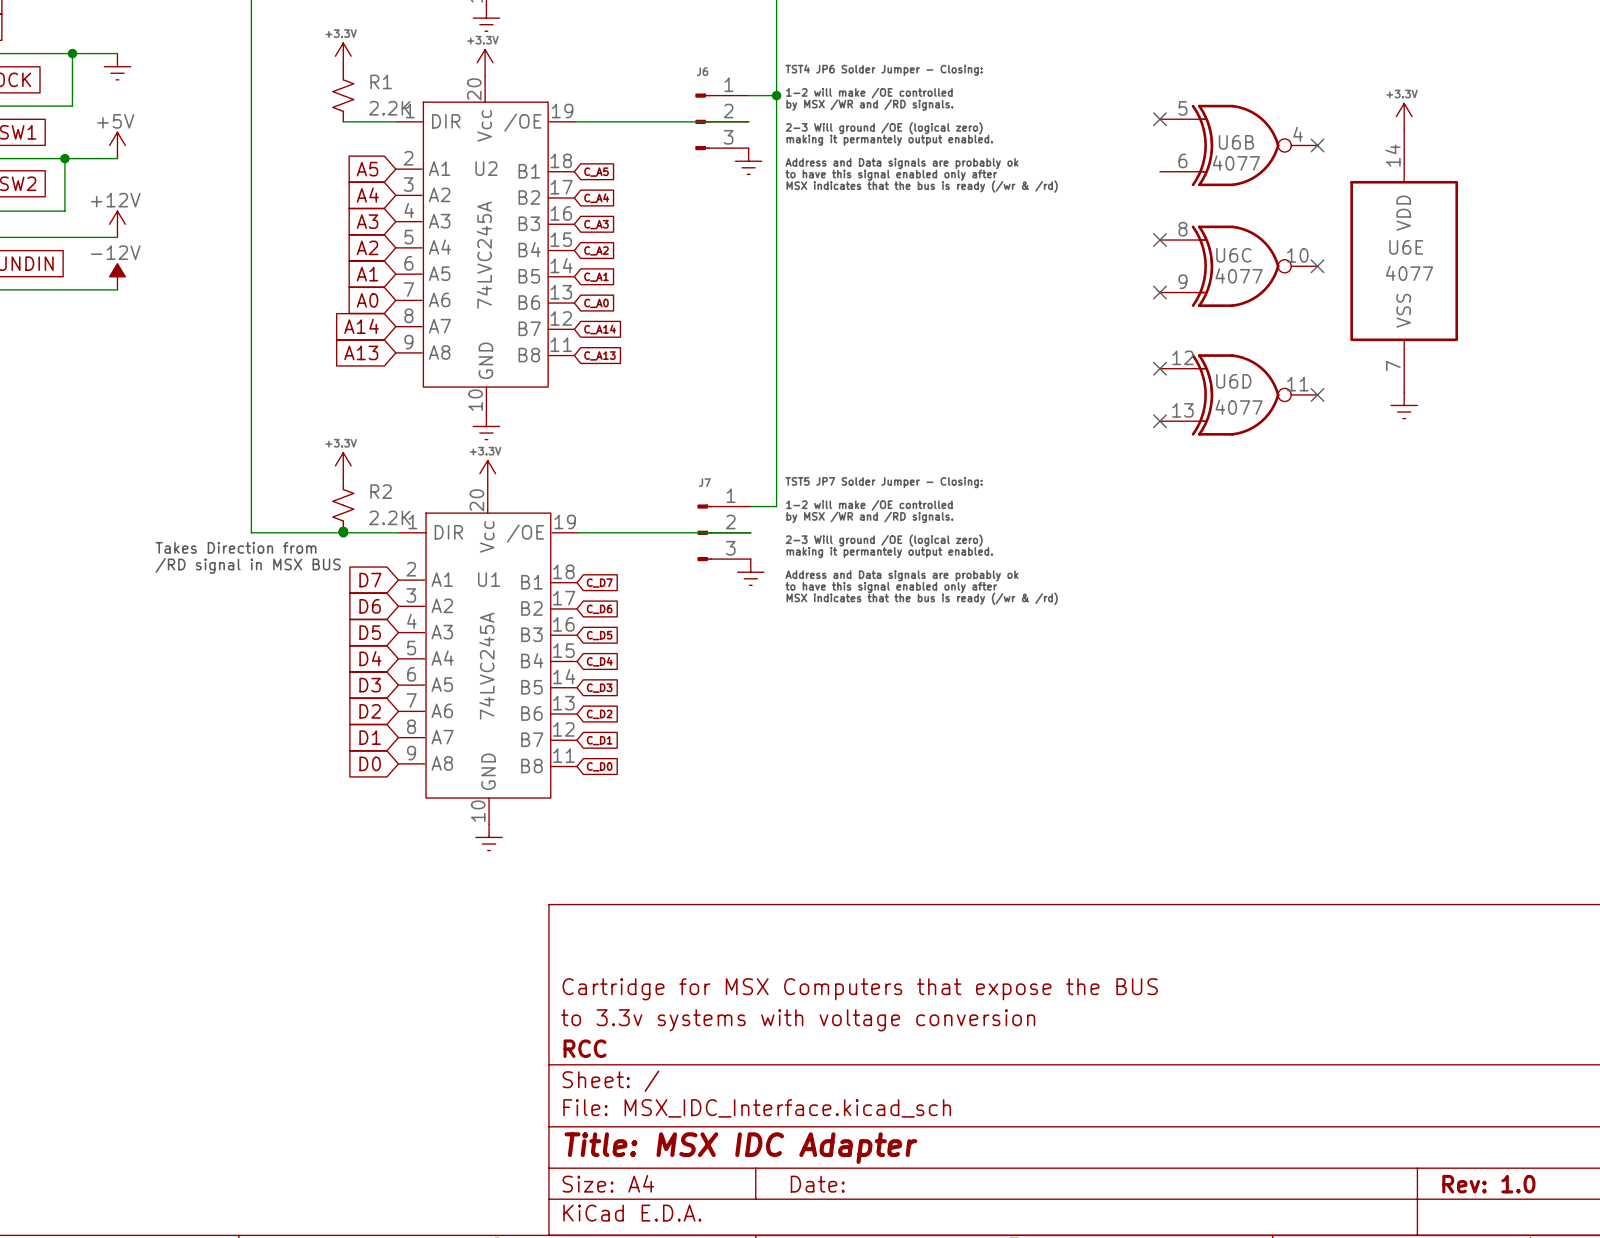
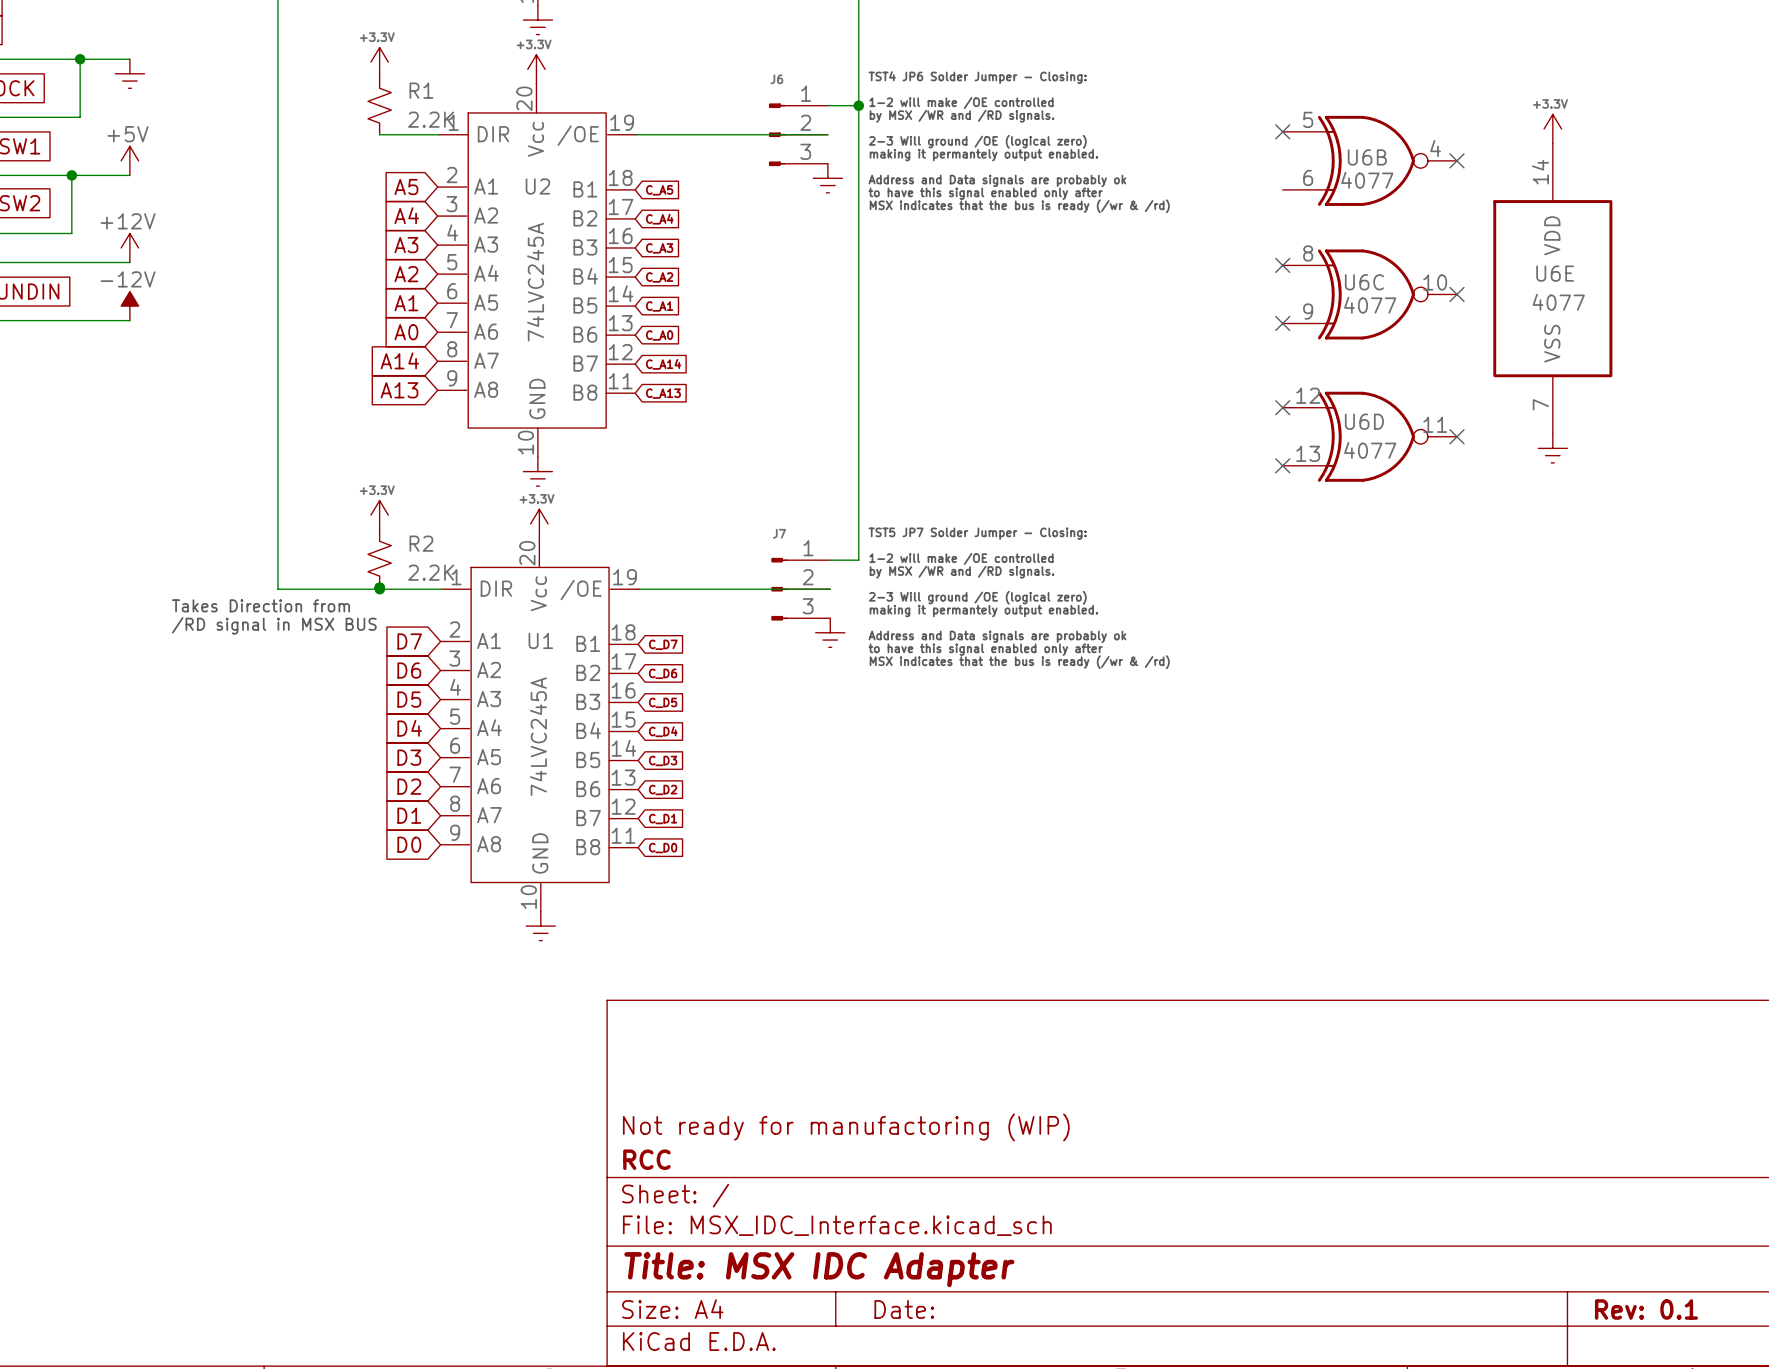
title block: Cartridge for MSX Computers that expose the BUS (860, 989) -> none
title block: to 3.3v systems with voltage conversion (798, 1020) -> Not ready for manufactoring (WIP) (846, 1127)
title block: Rev: 1.0 (1488, 1184) -> Rev: 0.1 (1646, 1309)

